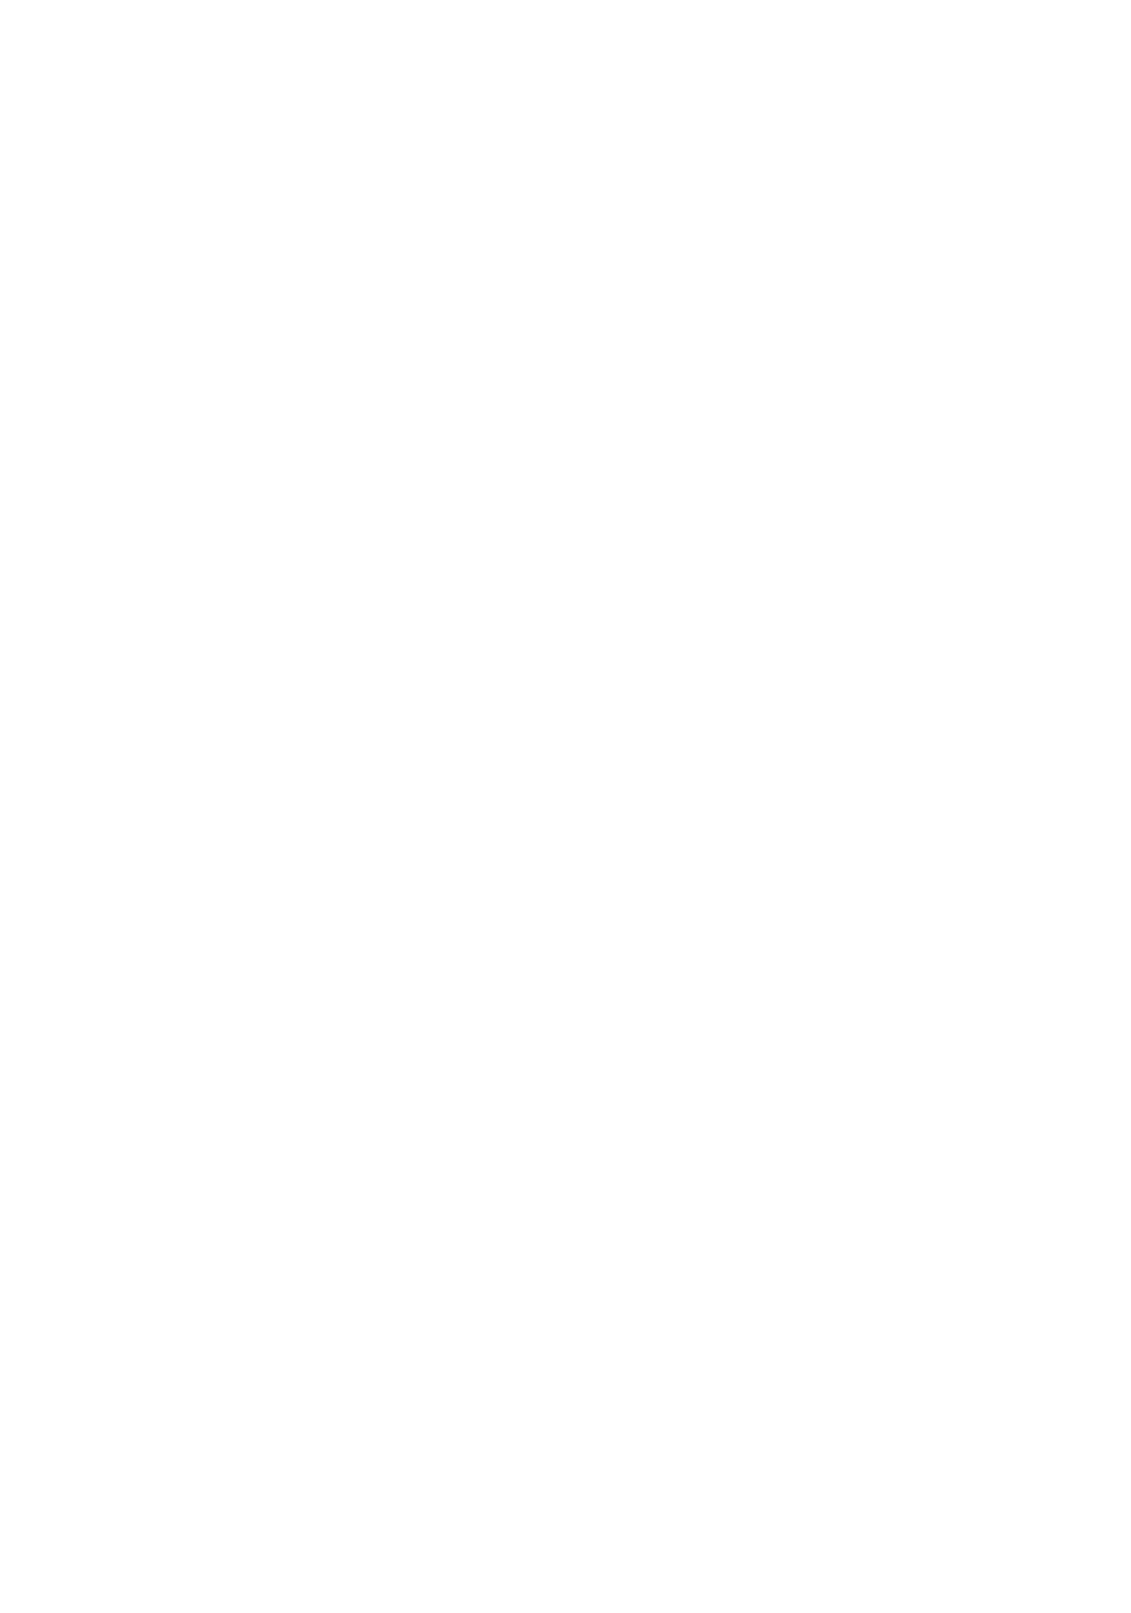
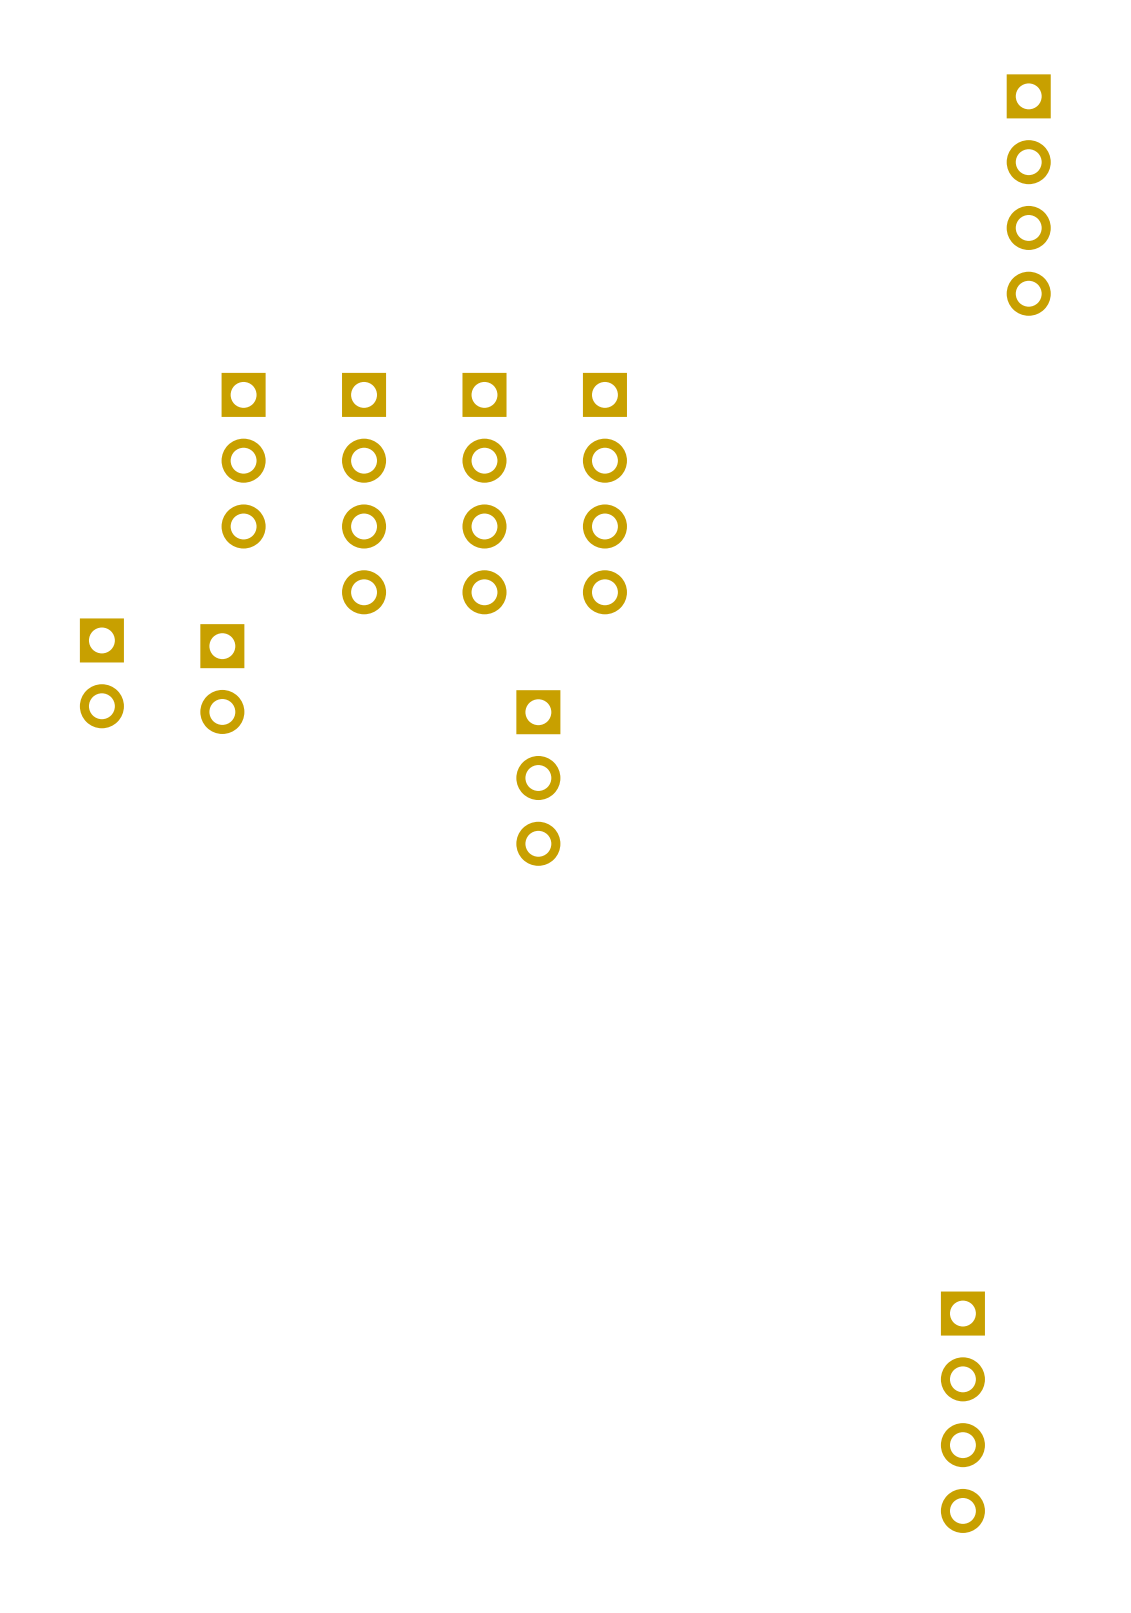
part: none -> (1028, 195)
part: none -> (243, 460)
part: none -> (364, 493)
part: none -> (484, 493)
part: none -> (604, 493)
part: none -> (101, 673)
part: none -> (222, 679)
part: none -> (538, 778)
part: none -> (962, 1412)

